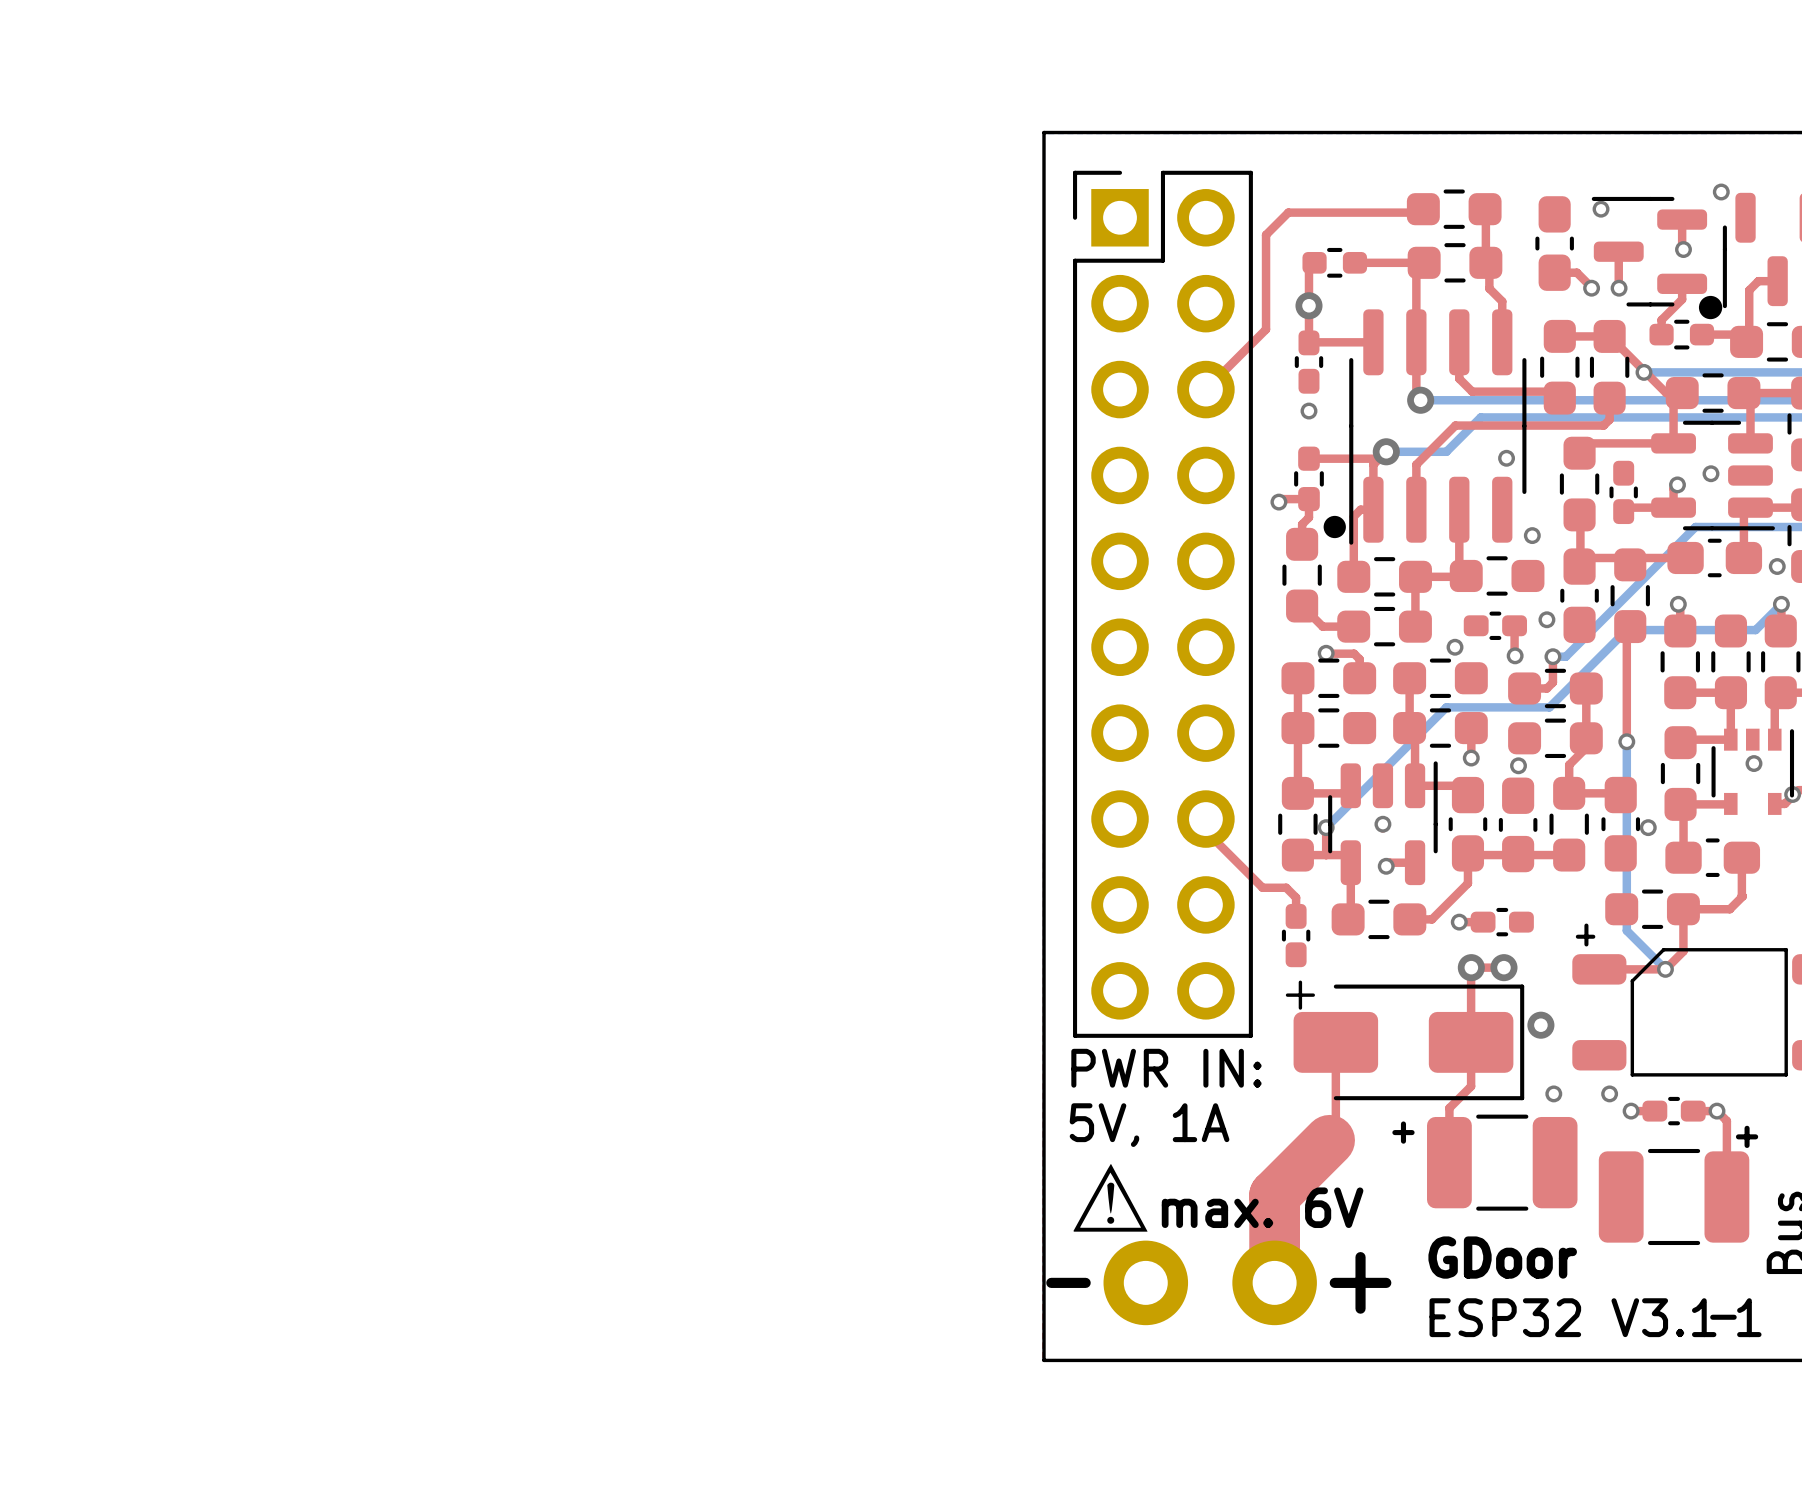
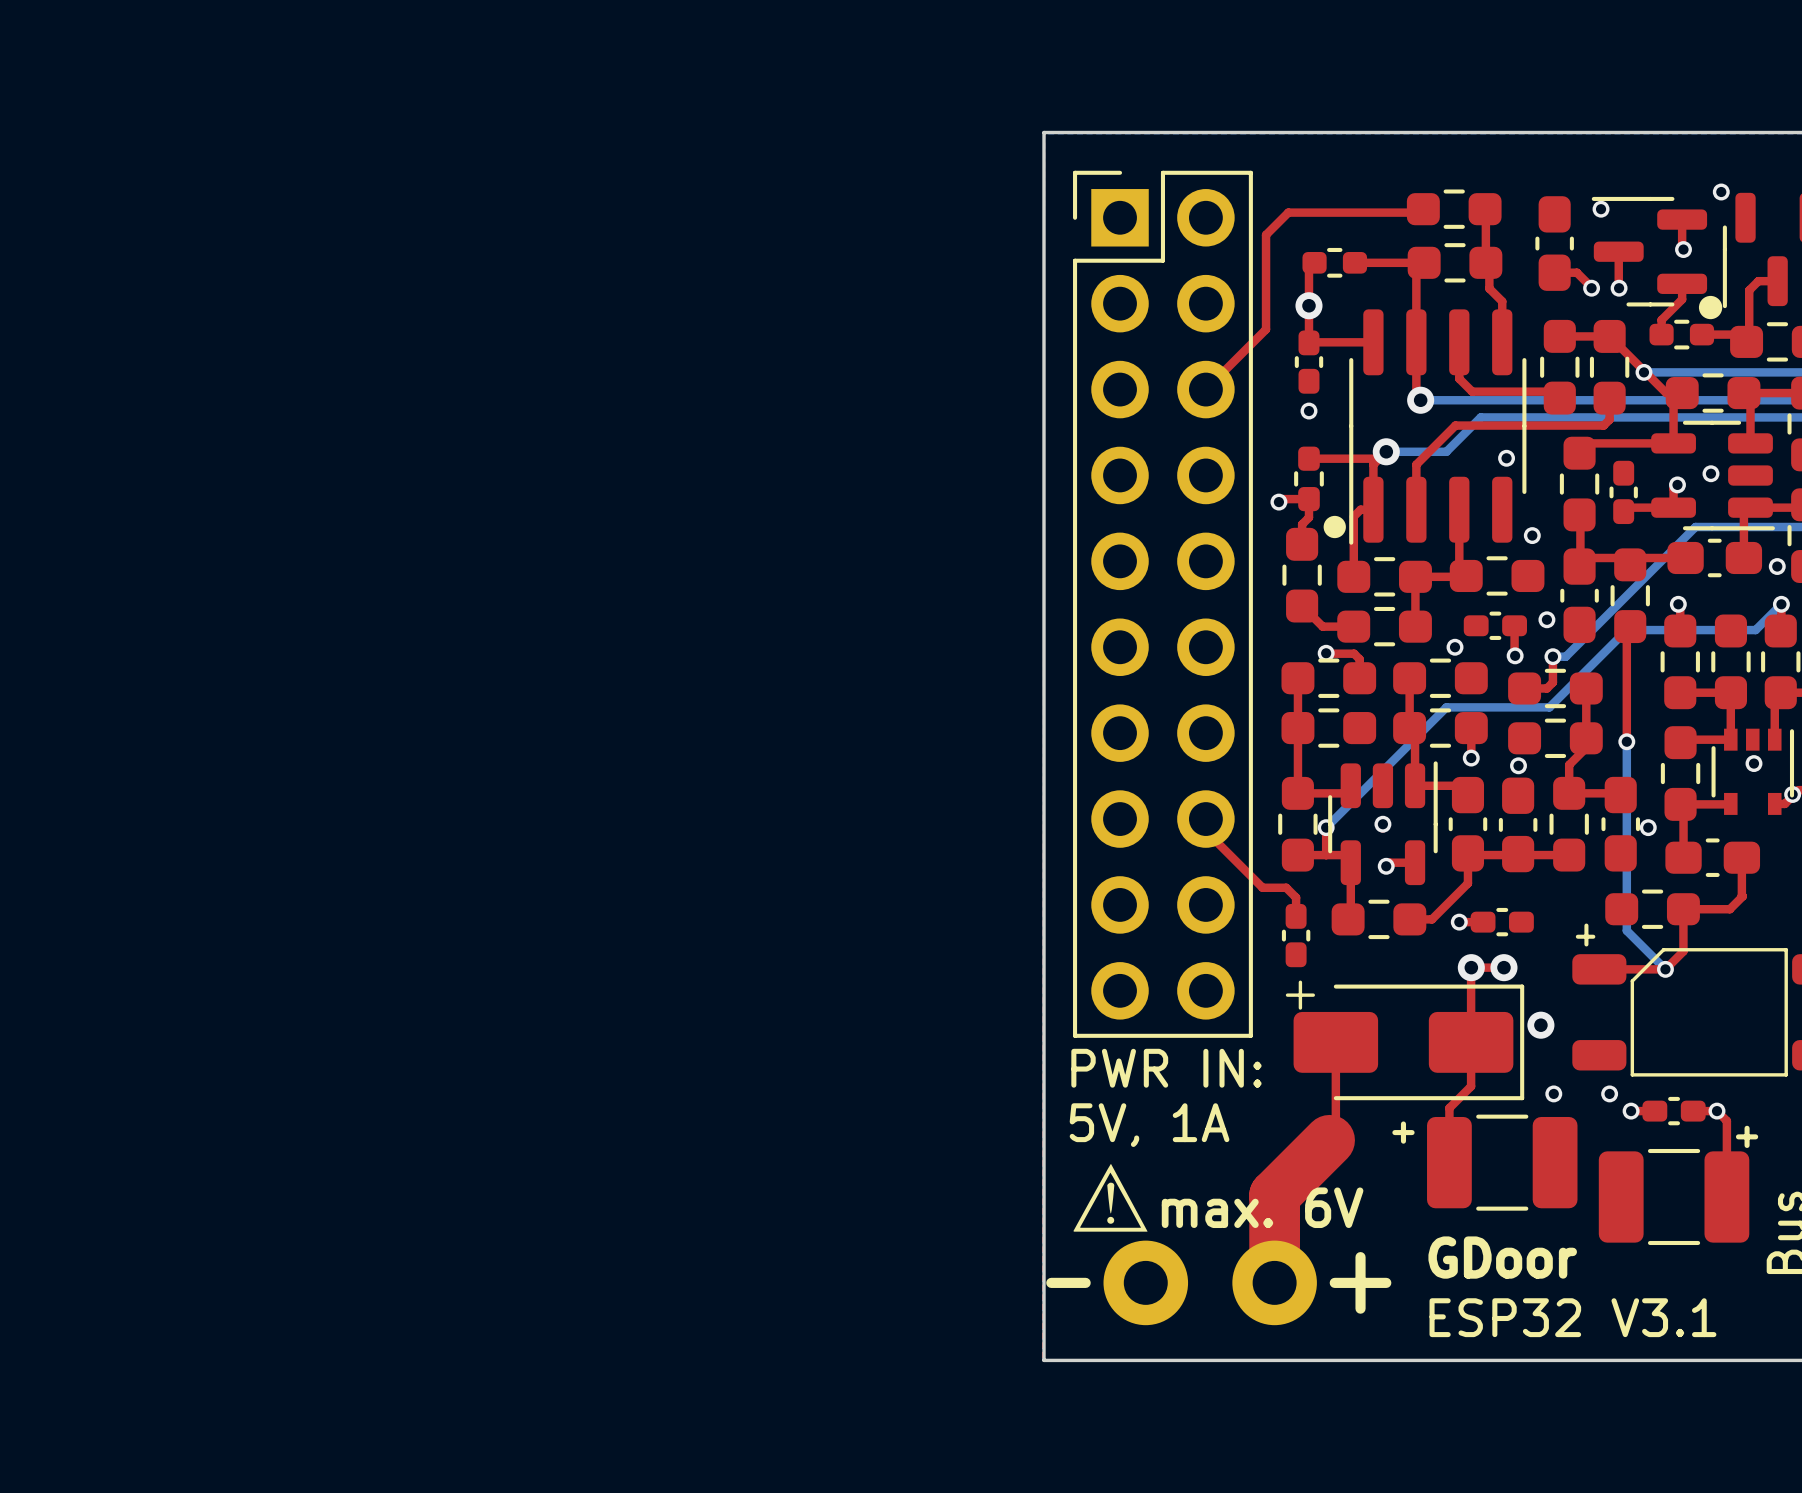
line: (1712, 1317) (1734, 1317) -> none
text: 1 (1749, 1317) -> none

